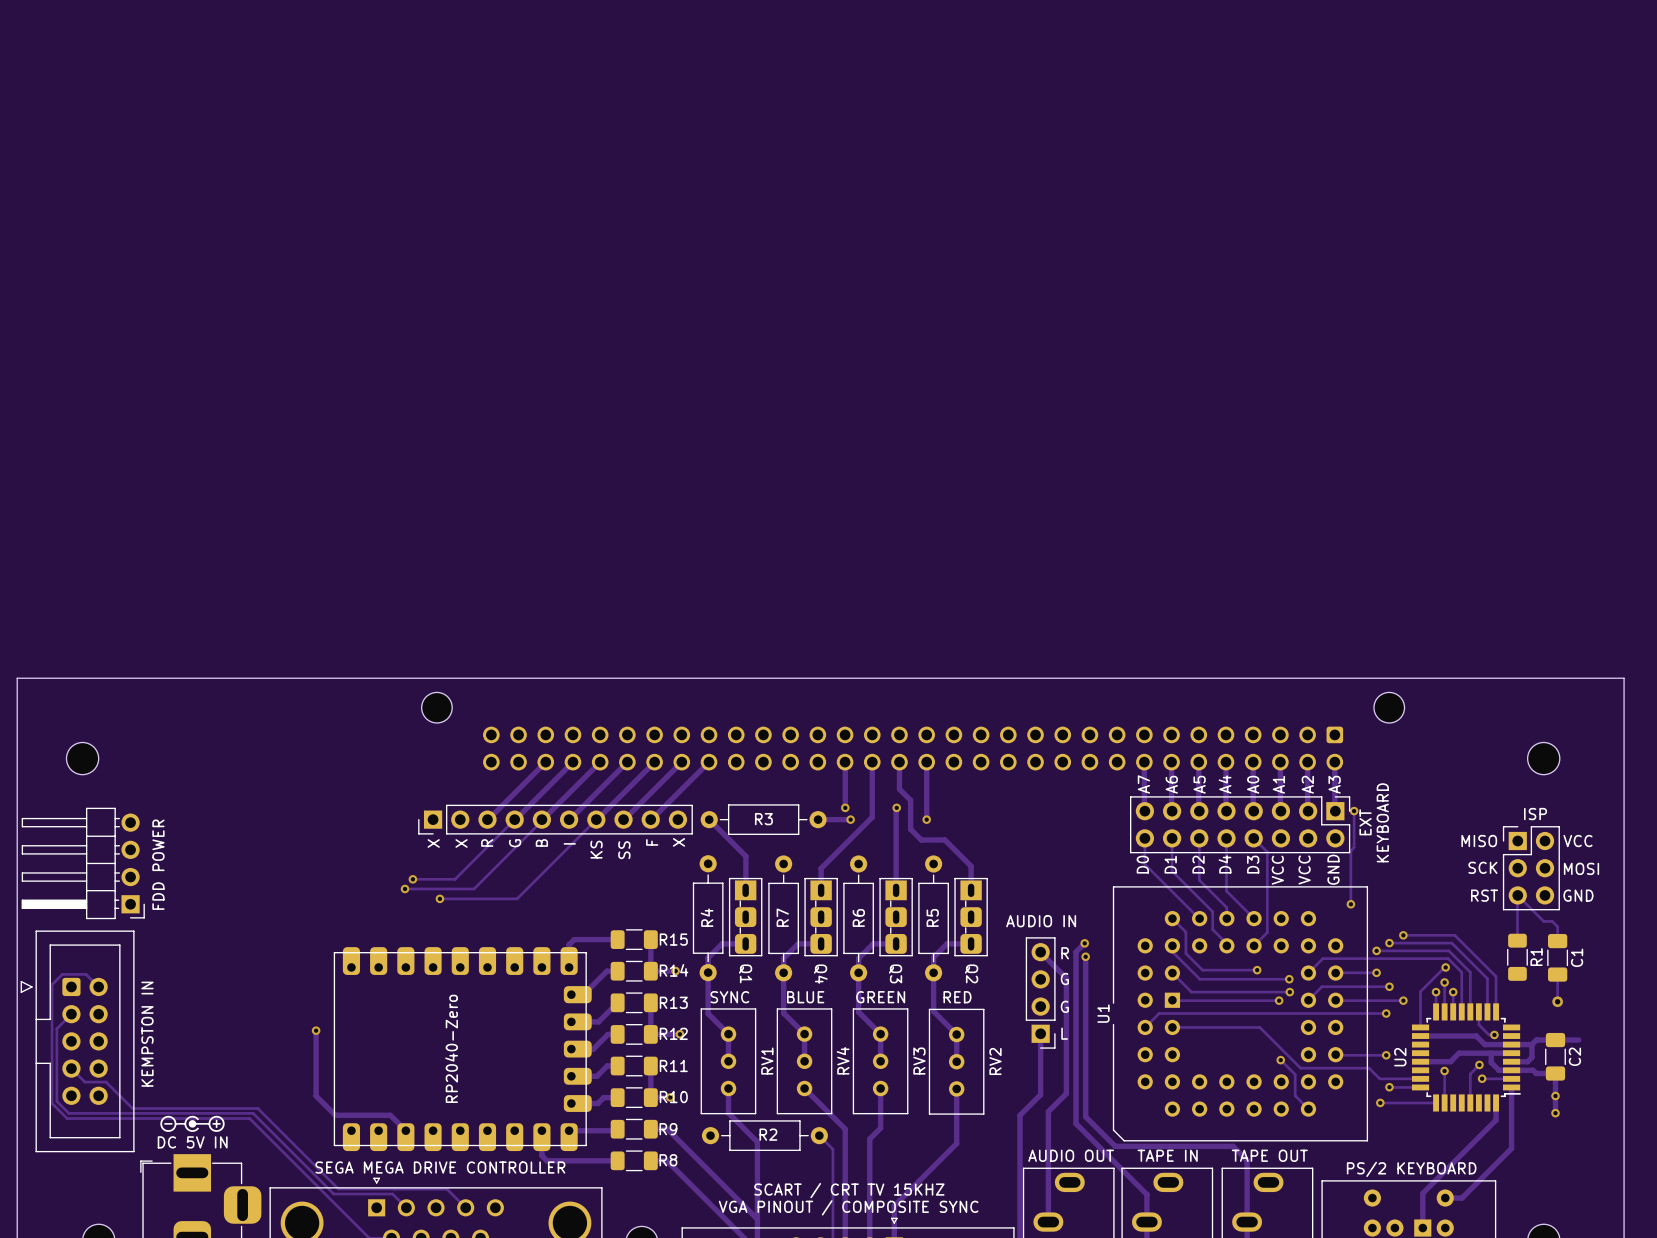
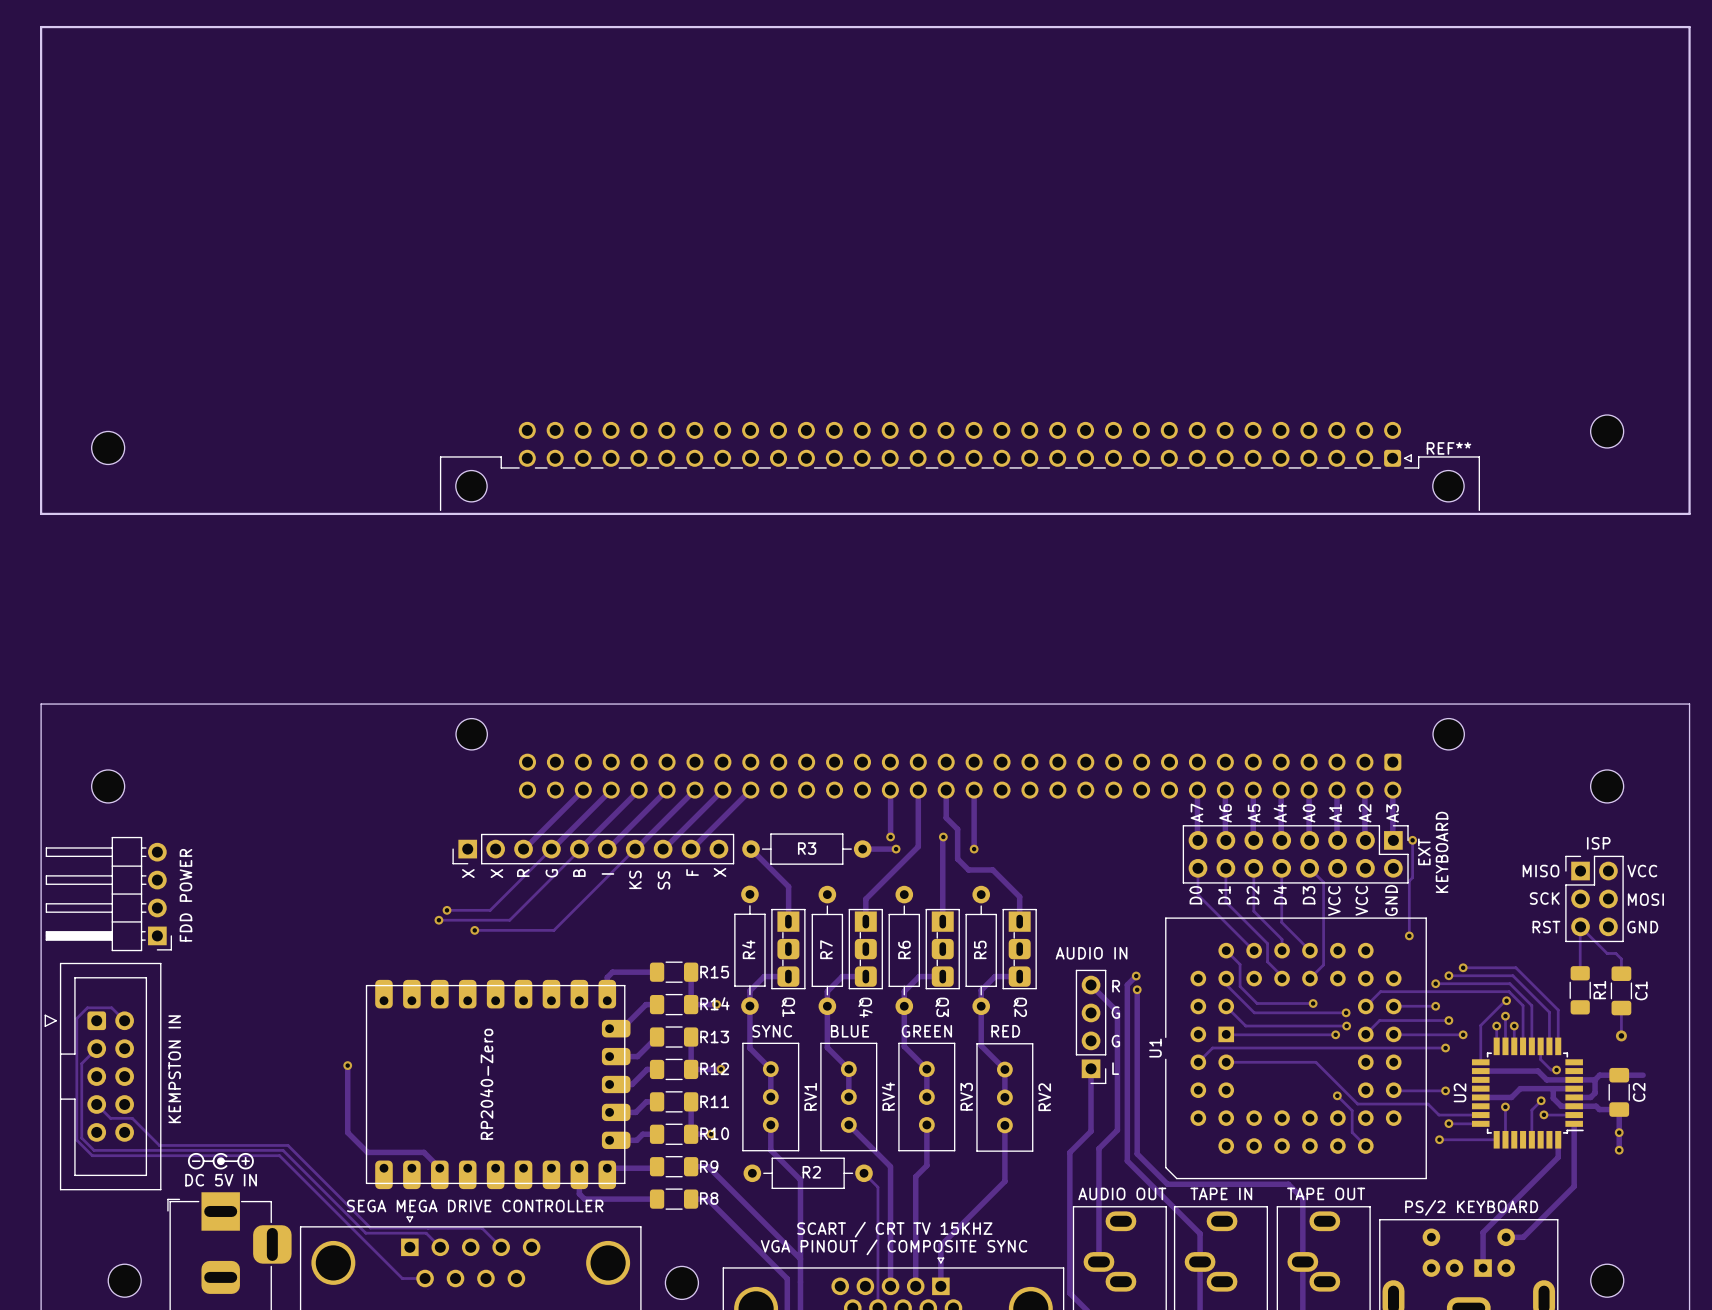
board edge: none -> (41, 27) (41, 513) (1689, 513) (1689, 27) (41, 27)
part: none -> (1607, 431)
part: none -> (108, 447)
REF**: none -> (959, 466)

